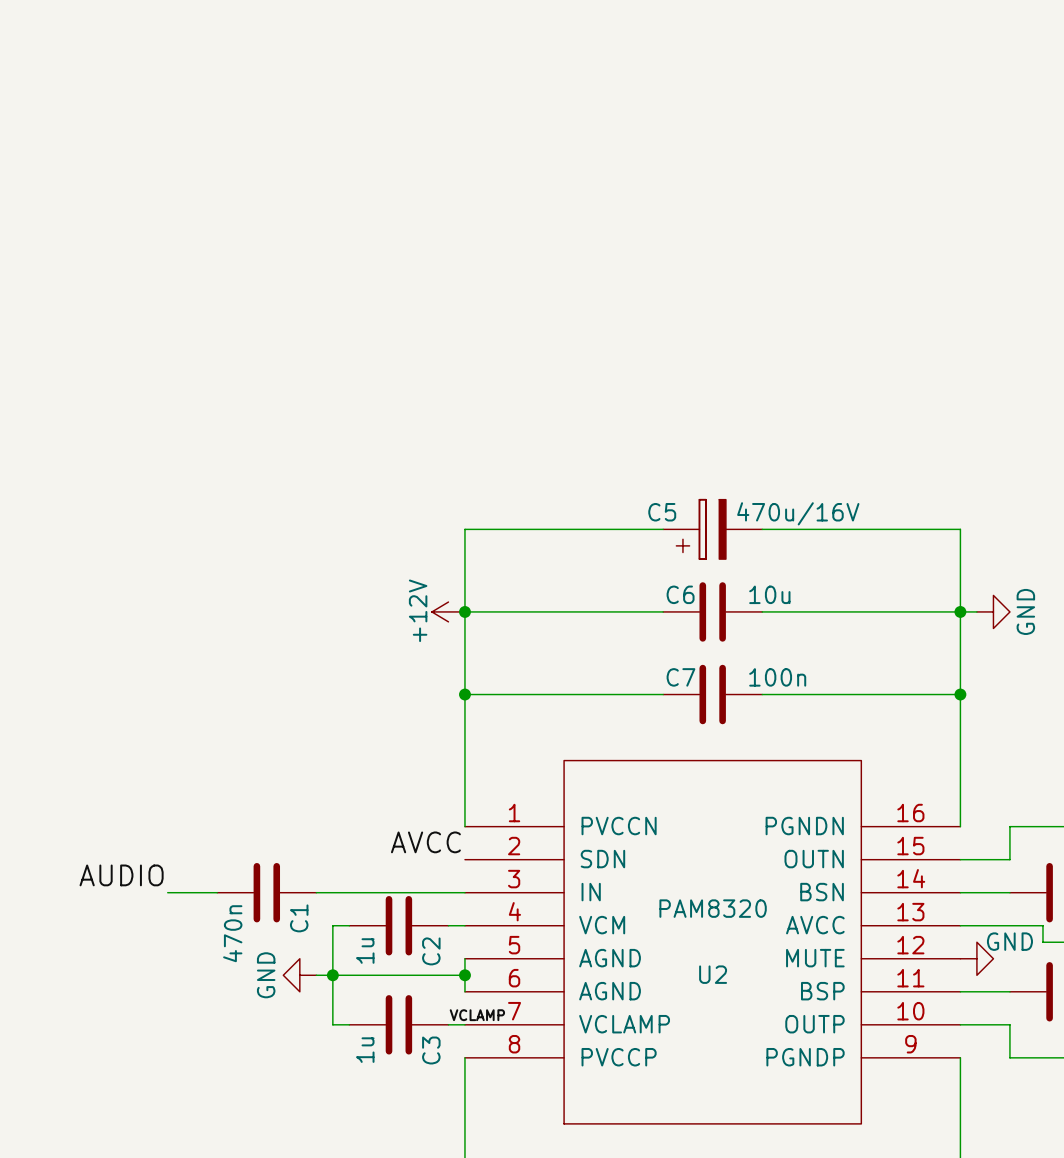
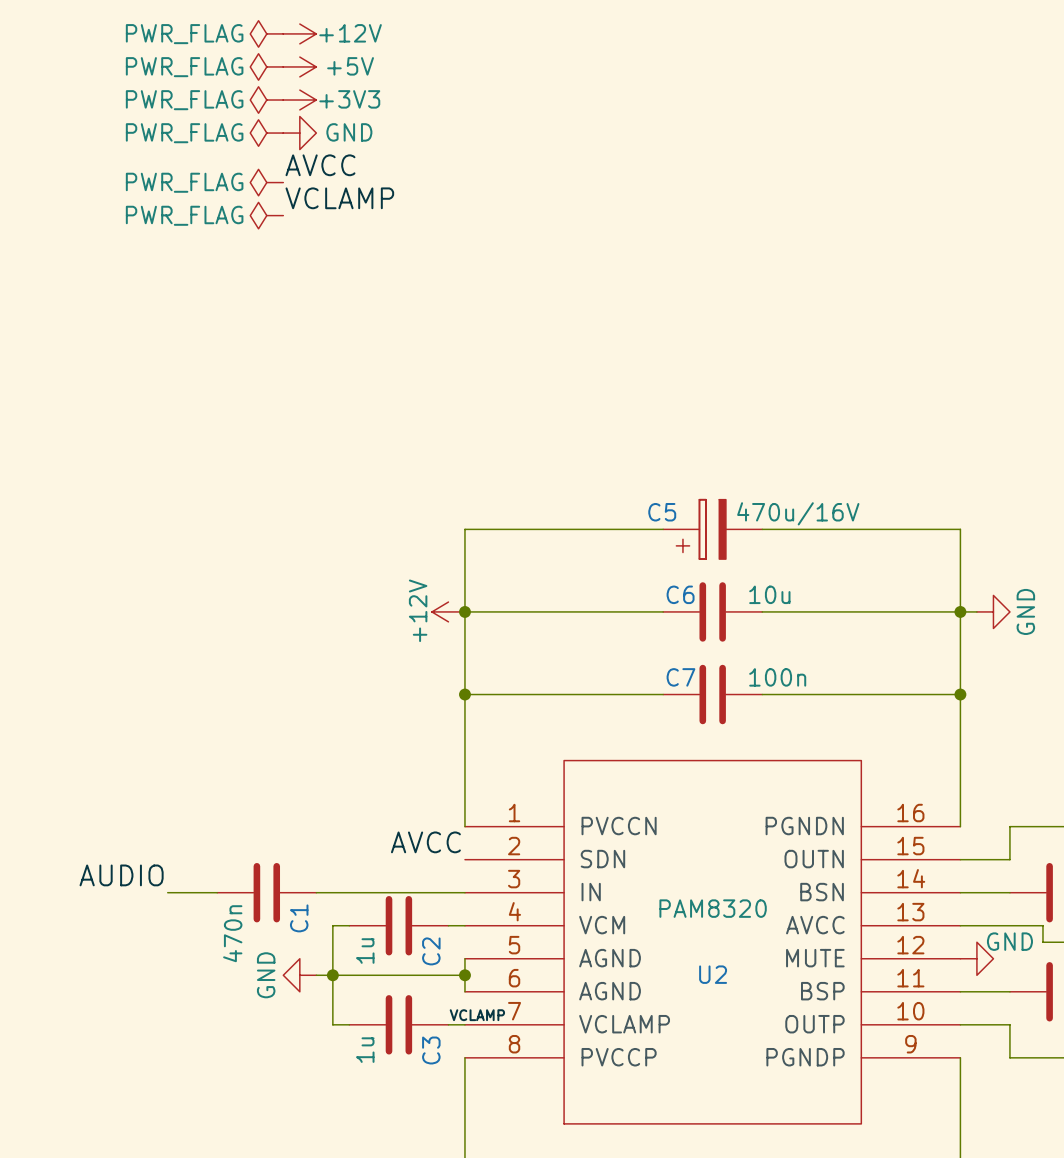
power symbol: none -> PWR_FLAG (266, 33)
power symbol: none -> +12V (299, 33)
power symbol: none -> PWR_FLAG (266, 66)
power symbol: none -> +5V (299, 66)
power symbol: none -> PWR_FLAG (266, 100)
power symbol: none -> +3V3 (299, 100)
power symbol: none -> PWR_FLAG (266, 133)
power symbol: none -> GND (299, 133)
label: none -> AVCC (320, 165)
power symbol: none -> PWR_FLAG (266, 182)
label: none -> VCLAMP (339, 198)
power symbol: none -> PWR_FLAG (266, 215)

